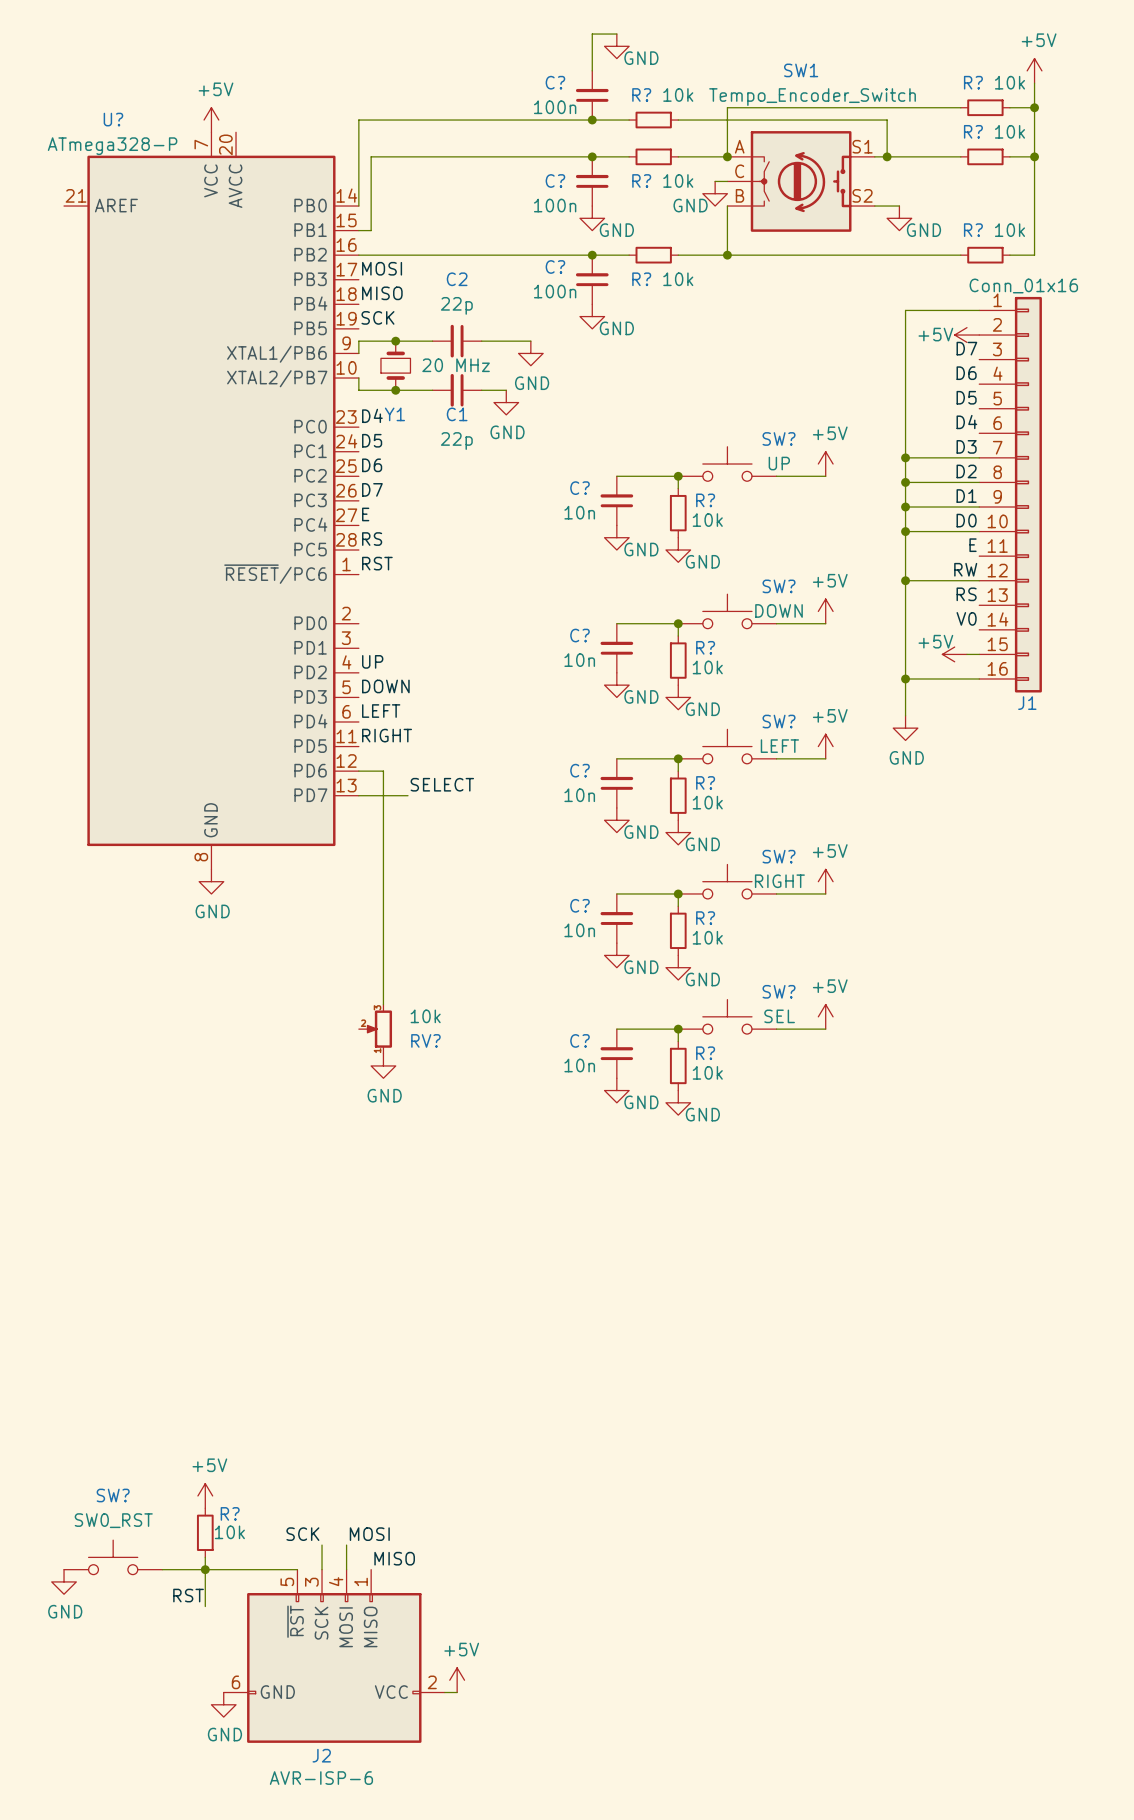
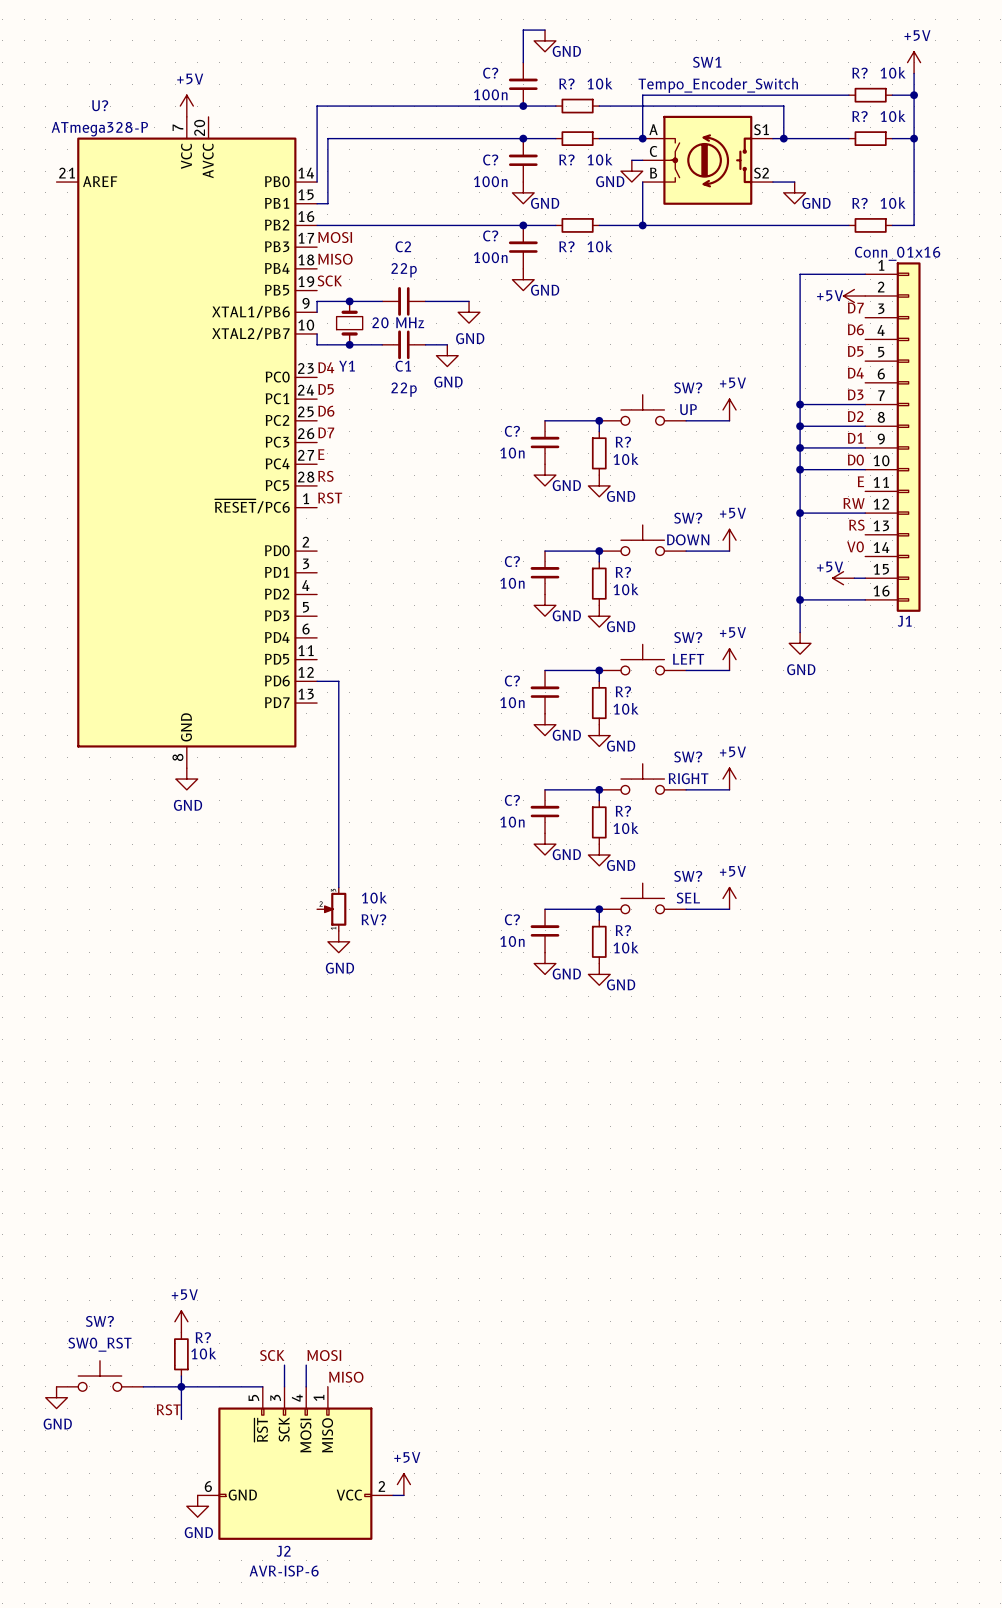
label: UP (372, 661) -> none
label: DOWN (385, 686) -> none
label: LEFT (381, 711) -> none
label: RIGHT (387, 735) -> none
label: SELECT (442, 784) -> none
wire: (358, 795) (408, 795) -> none

